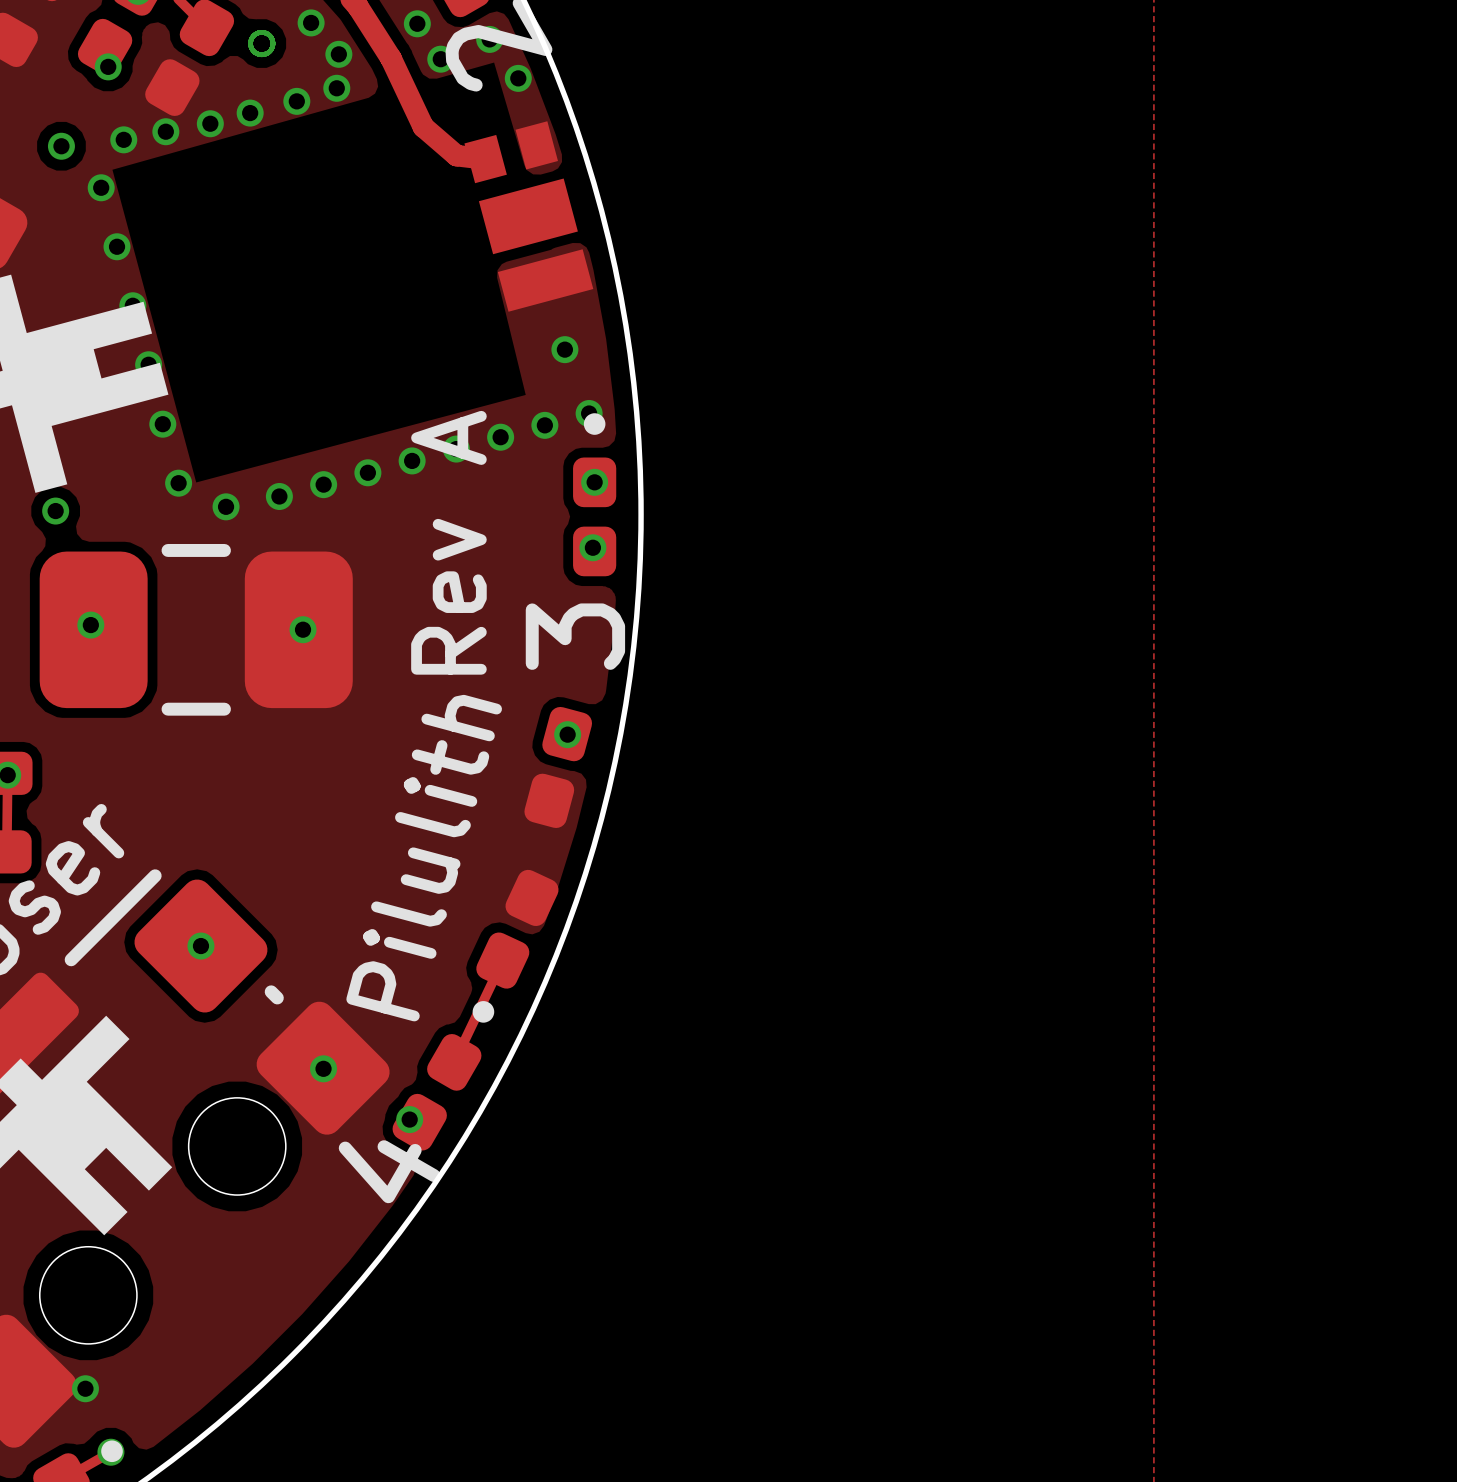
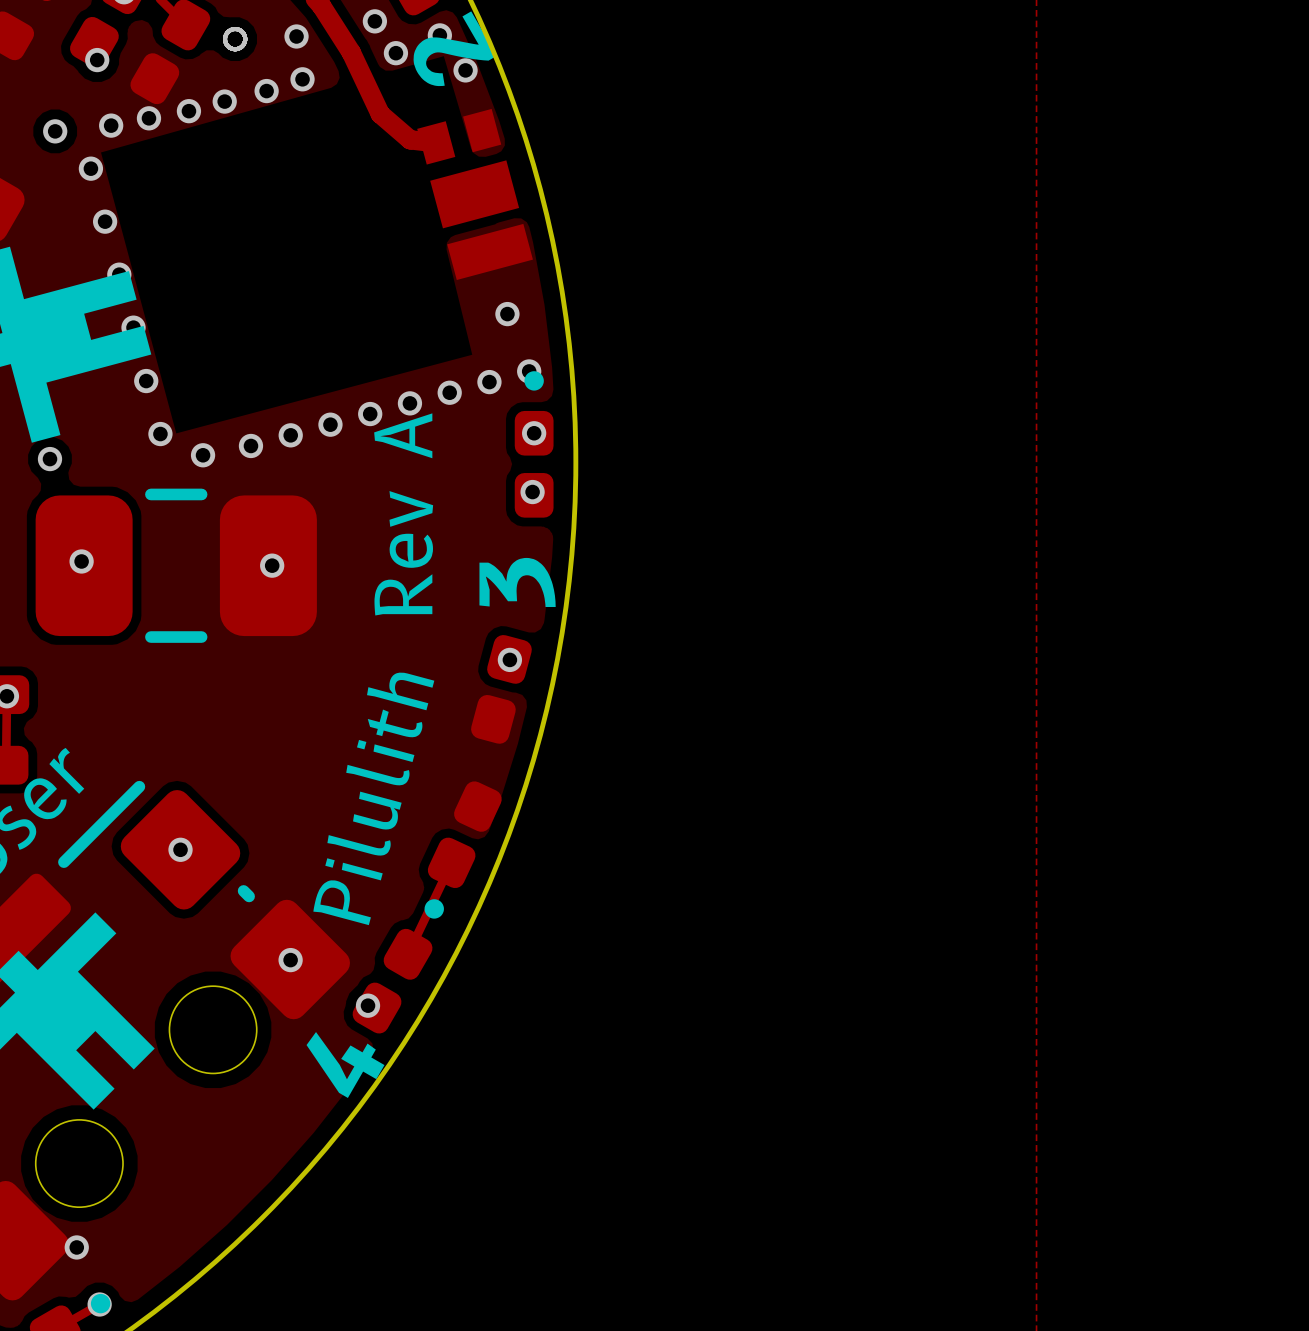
via: (311, 22) -> none
via: none -> (296, 36)
via: (338, 54) -> none

